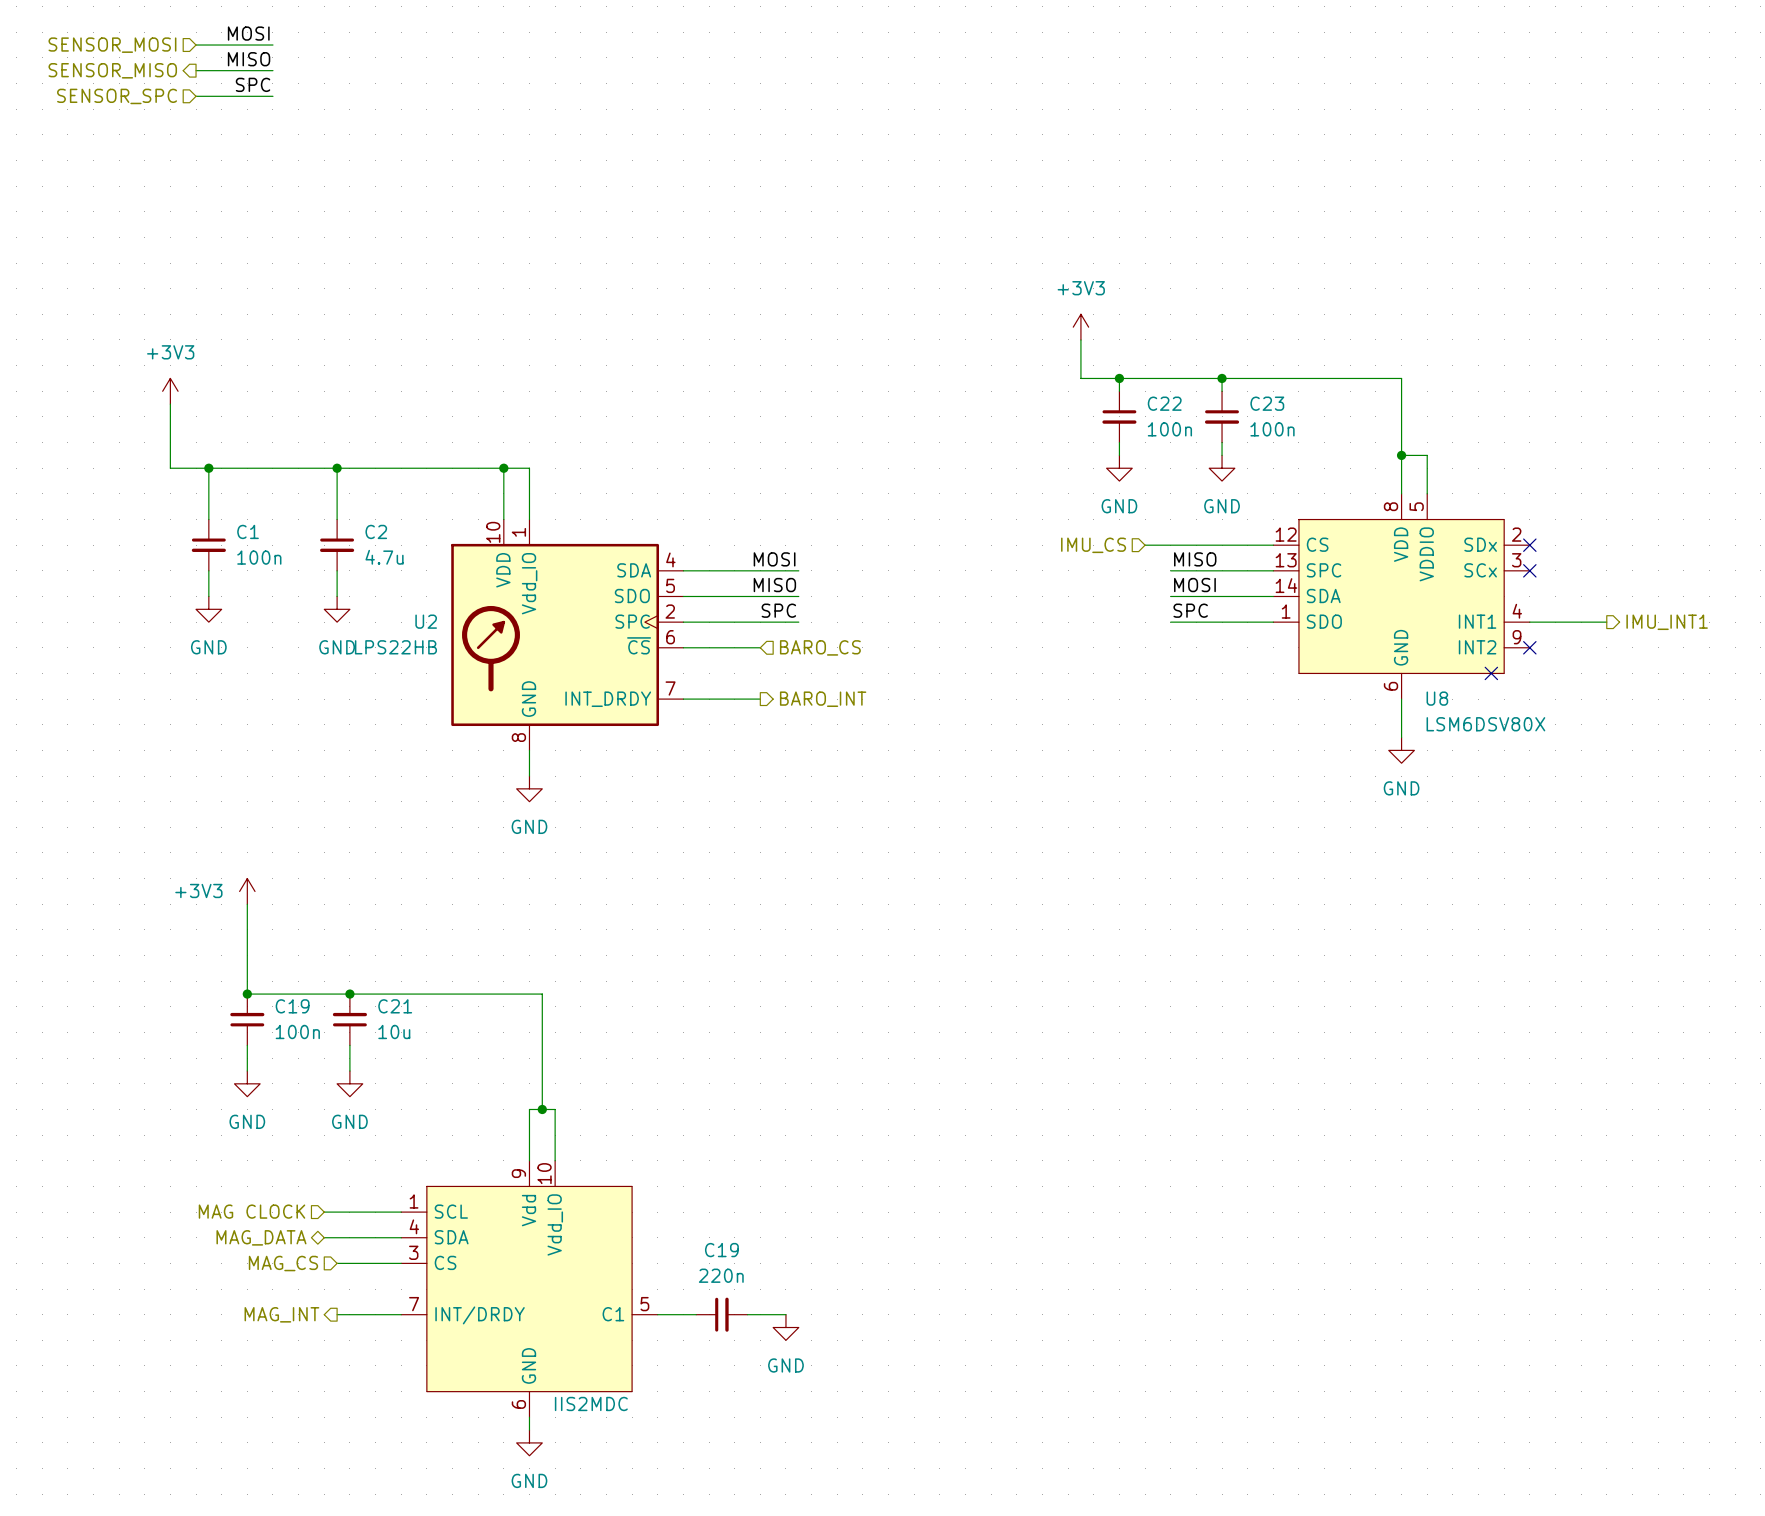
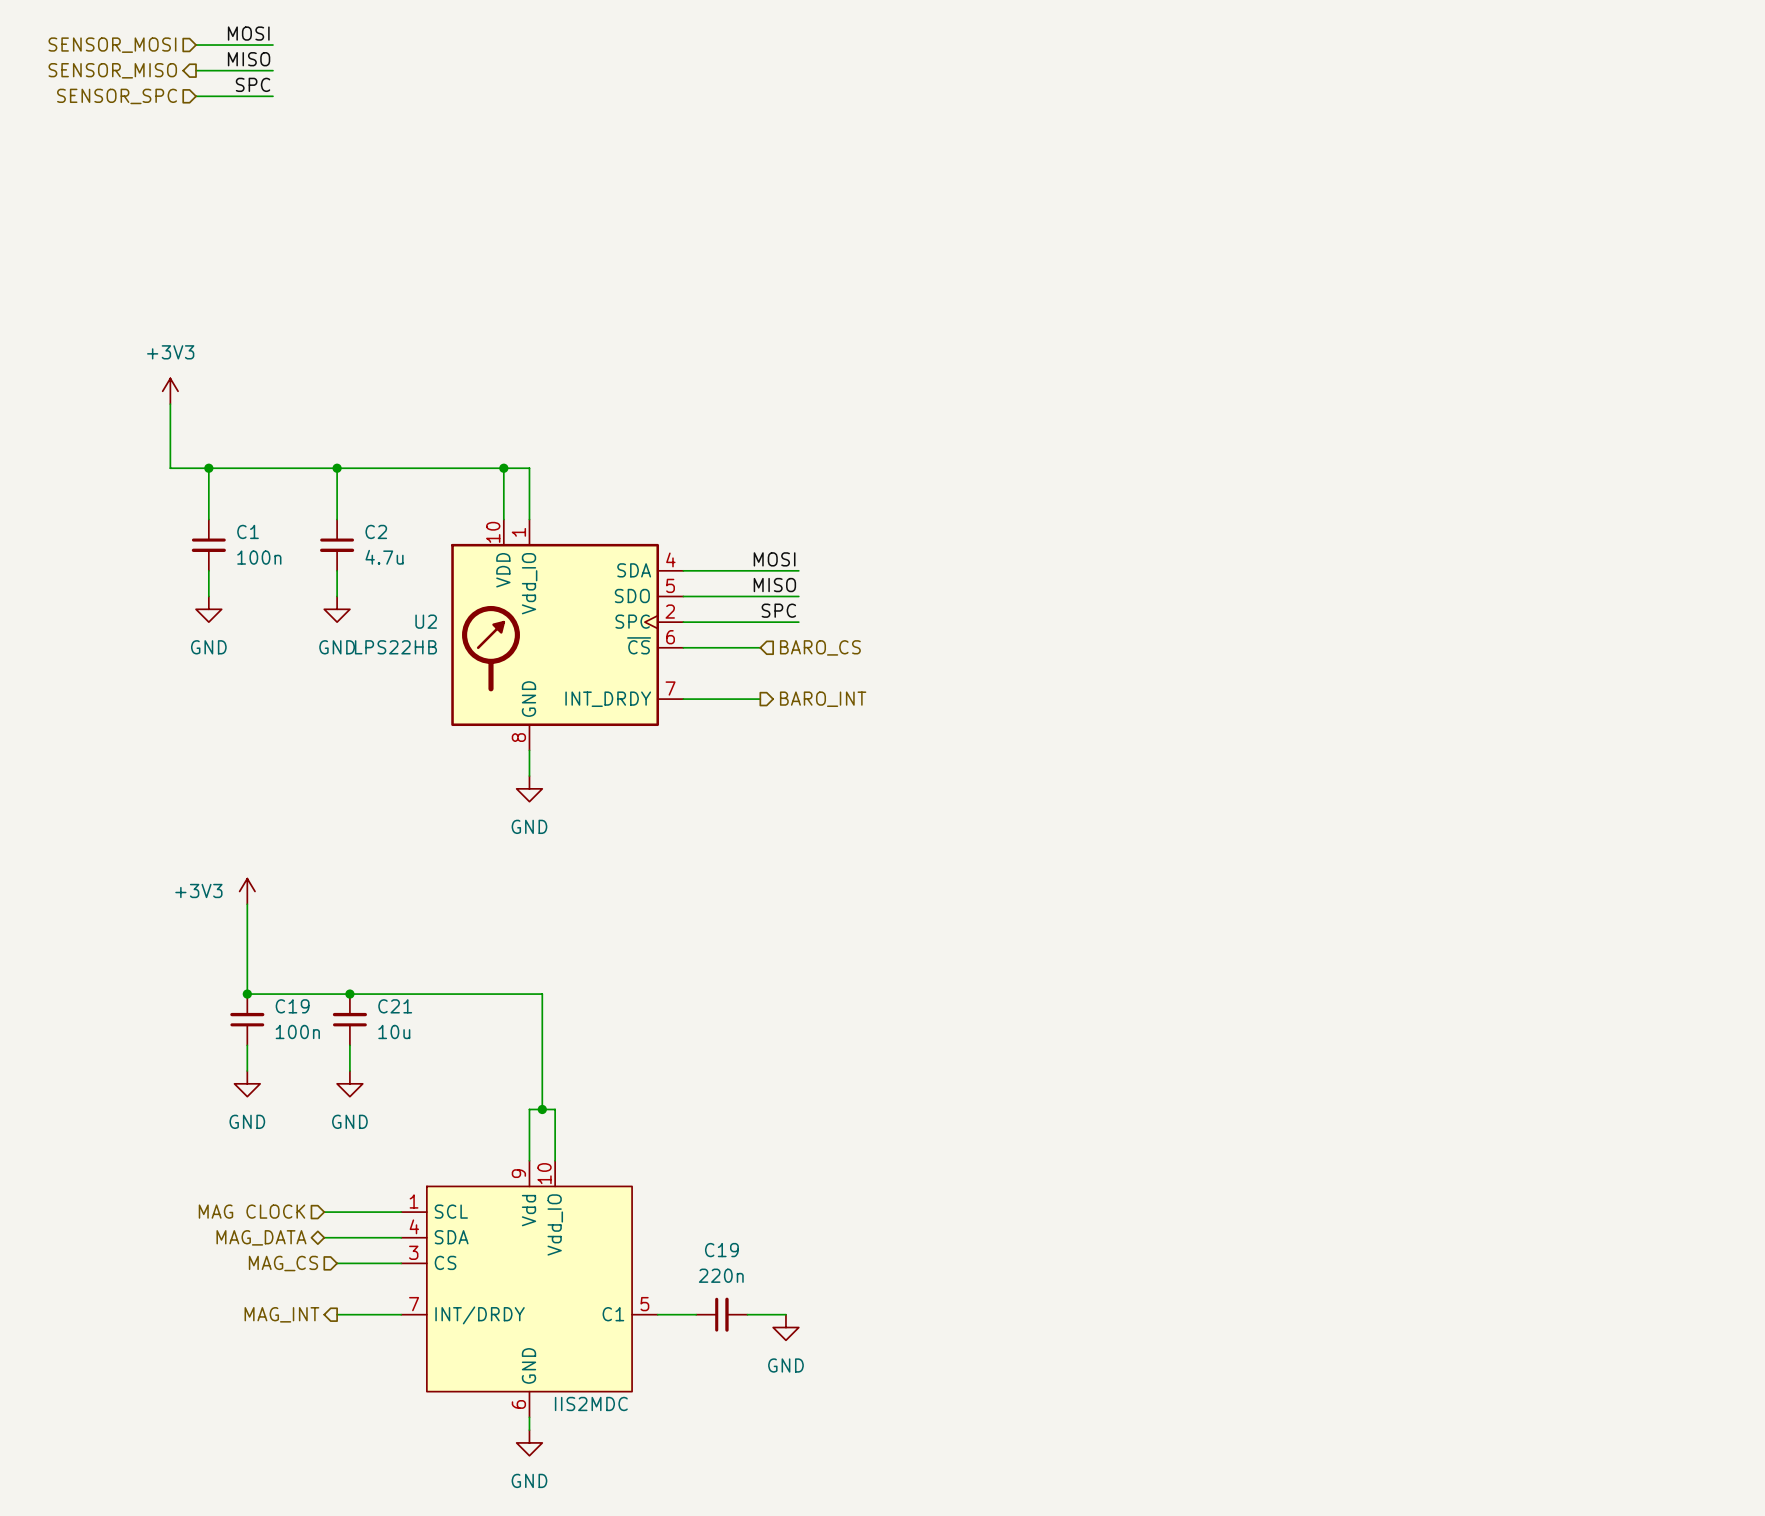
power symbol: +3V3 (1080, 327) -> none
wire: (1080, 339) (1080, 378) (1401, 378) (1401, 493) -> none
wire: (1119, 378) (1119, 391) -> none
junction: (1119, 378) -> none
wire: (1222, 378) (1222, 391) -> none
junction: (1222, 378) -> none
C22: 100n (1119, 416) -> none
C23: 100n (1222, 416) -> none
wire: (1119, 442) (1119, 455) -> none
wire: (1222, 442) (1222, 455) -> none
wire: (1401, 455) (1427, 455) (1427, 493) -> none
junction: (1401, 455) -> none
power symbol: GND (1119, 468) -> none
power symbol: GND (1222, 468) -> none
hierarchical label: IMU_CS (1093, 545) -> none
wire: (1145, 545) (1273, 545) -> none
no-connect mark: (1529, 545) -> none
label: MISO (1195, 559) -> none
wire: (1170, 570) (1273, 570) -> none
no-connect mark: (1529, 570) -> none
label: MOSI (1194, 585) -> none
wire: (1170, 596) (1273, 596) -> none
U8: LSM6DSV80X (1401, 596) -> none
label: SPC (1190, 610) -> none
wire: (1170, 622) (1273, 622) -> none
wire: (1529, 622) (1606, 622) -> none
hierarchical label: IMU_INT1 (1667, 622) -> none
no-connect mark: (1529, 647) -> none
no-connect mark: (1491, 673) -> none
wire: (1401, 699) (1401, 737) -> none
power symbol: GND (1401, 750) -> none

